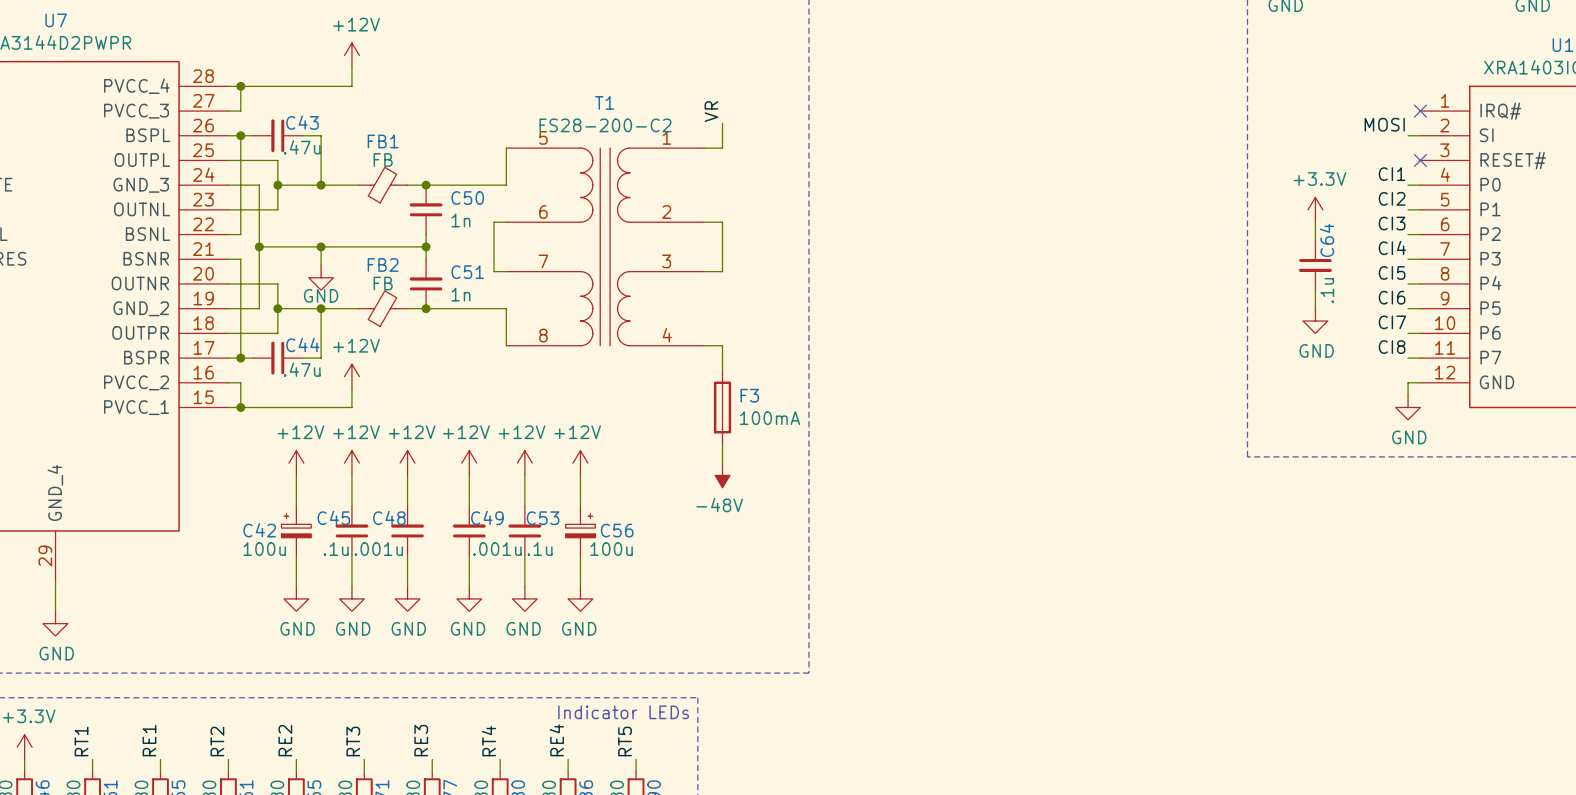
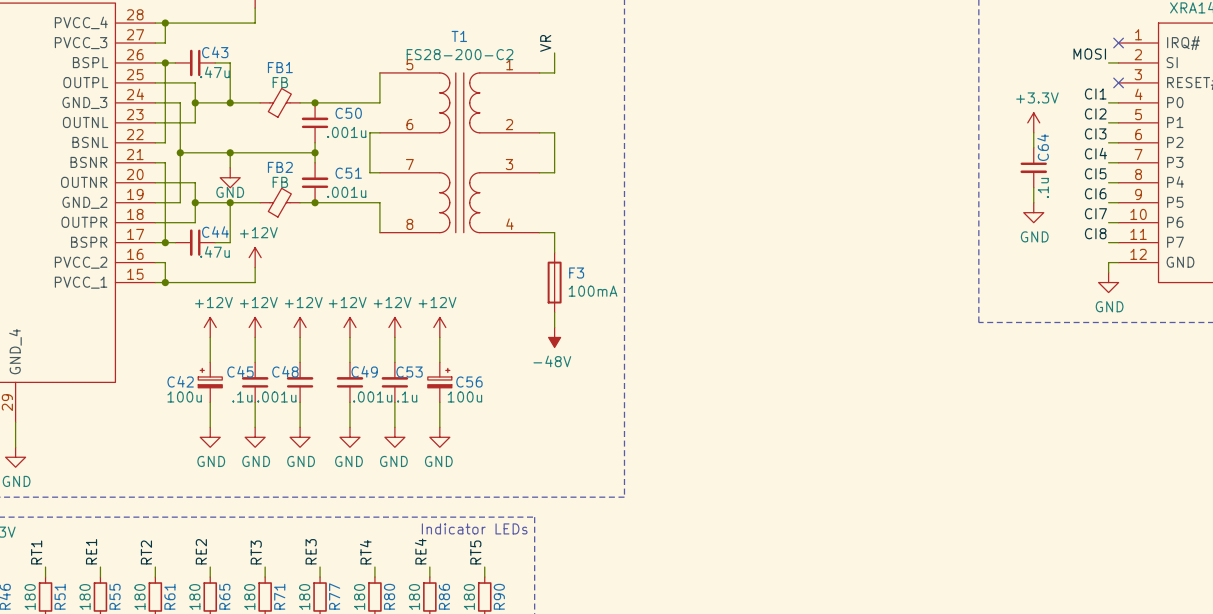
C50 value: 1n (460, 220) -> .001u (346, 132)
C51 value: 1n (460, 294) -> .001u (346, 192)

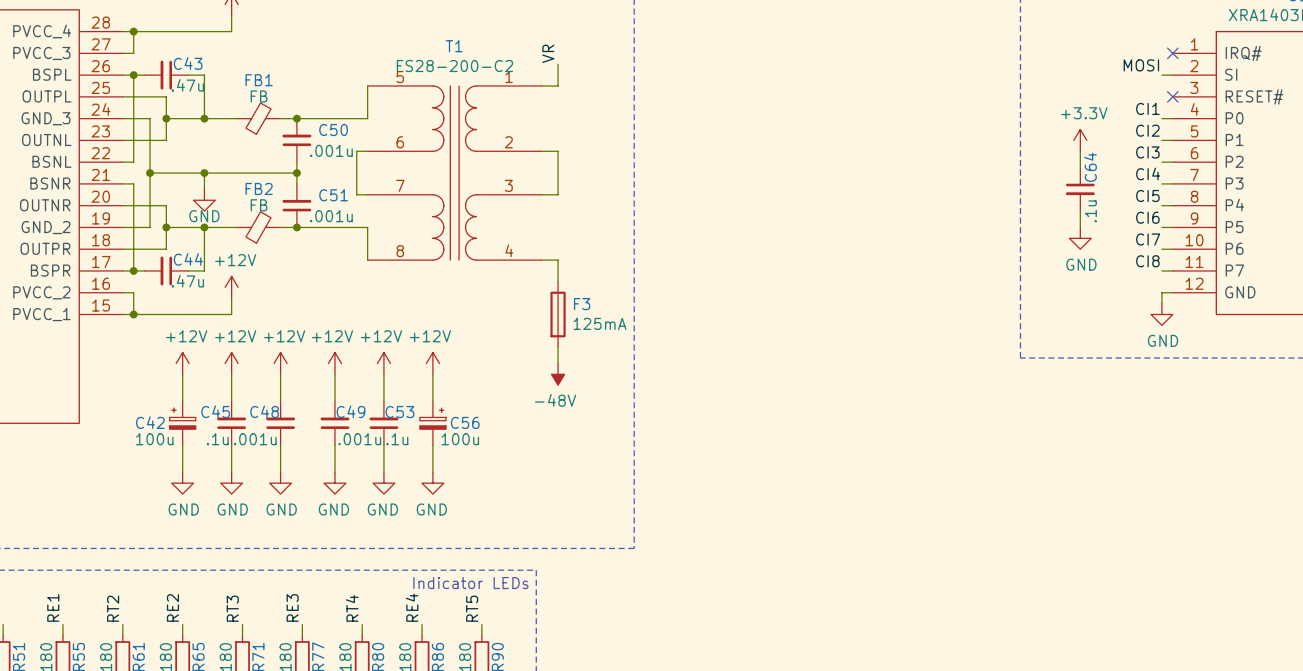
F3 value: 100mA (593, 291) -> 125mA (599, 323)

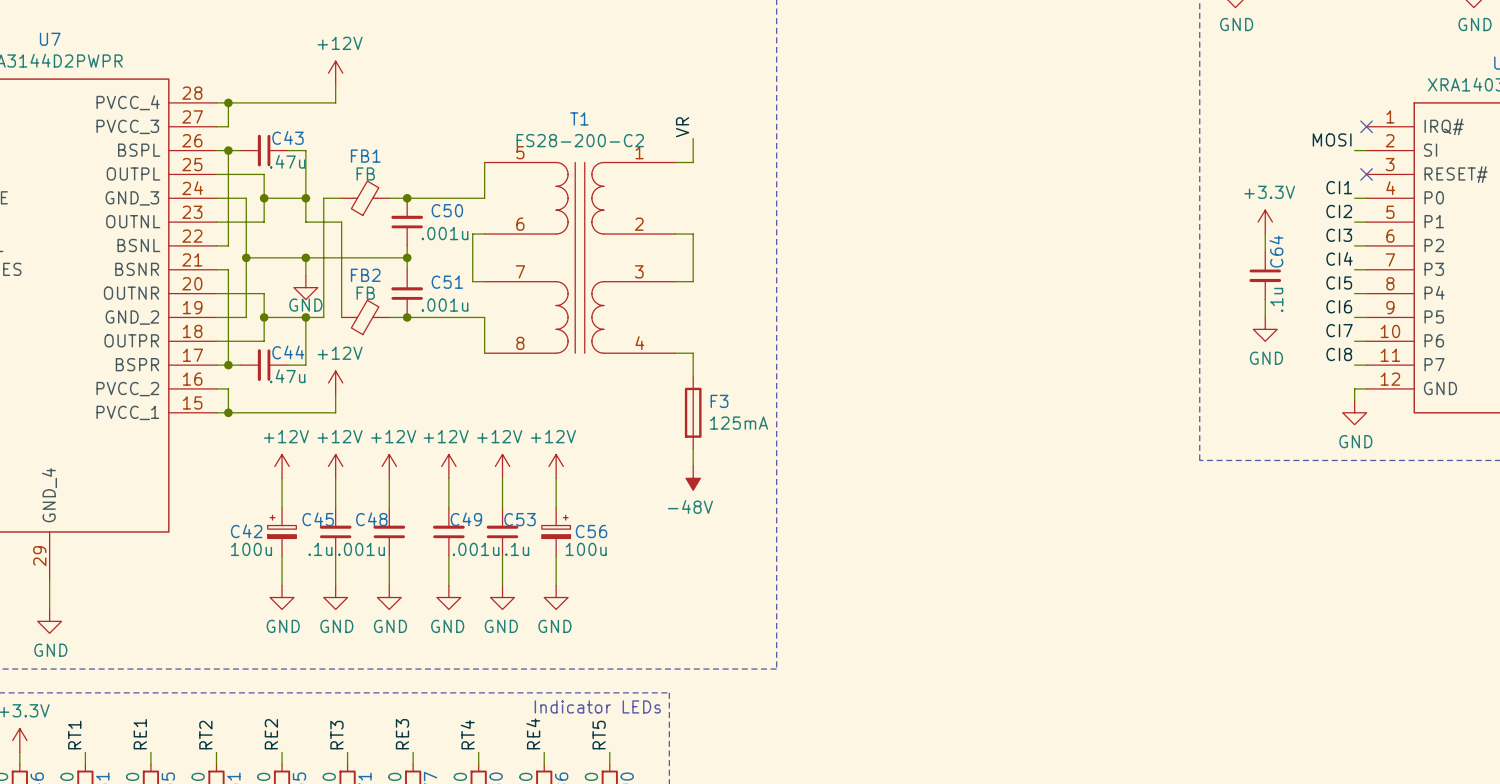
wire: (204, 118) (220, 118) -> (305, 198) (305, 222) (341, 222) (341, 317)
wire: (220, 227) (237, 227) -> (323, 317) (323, 198)

